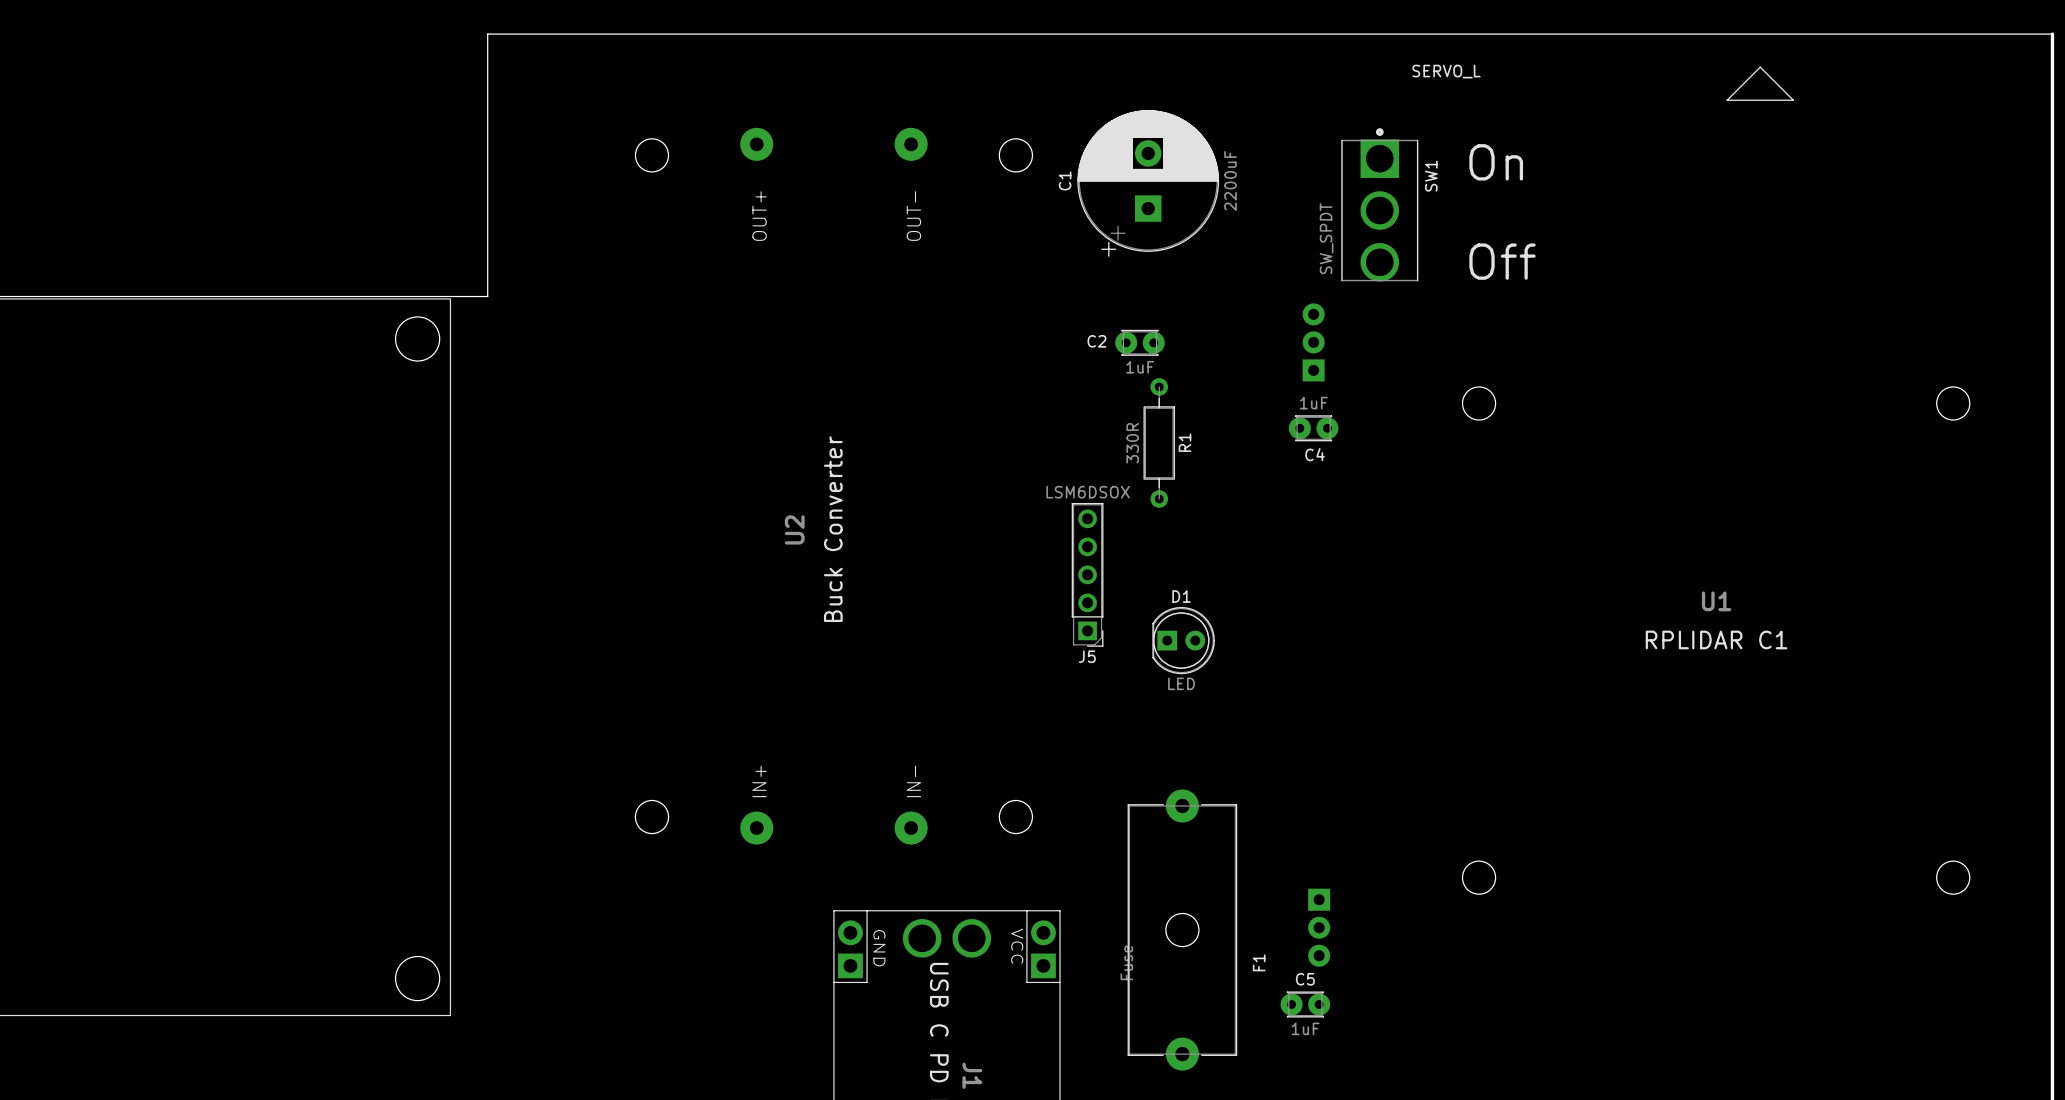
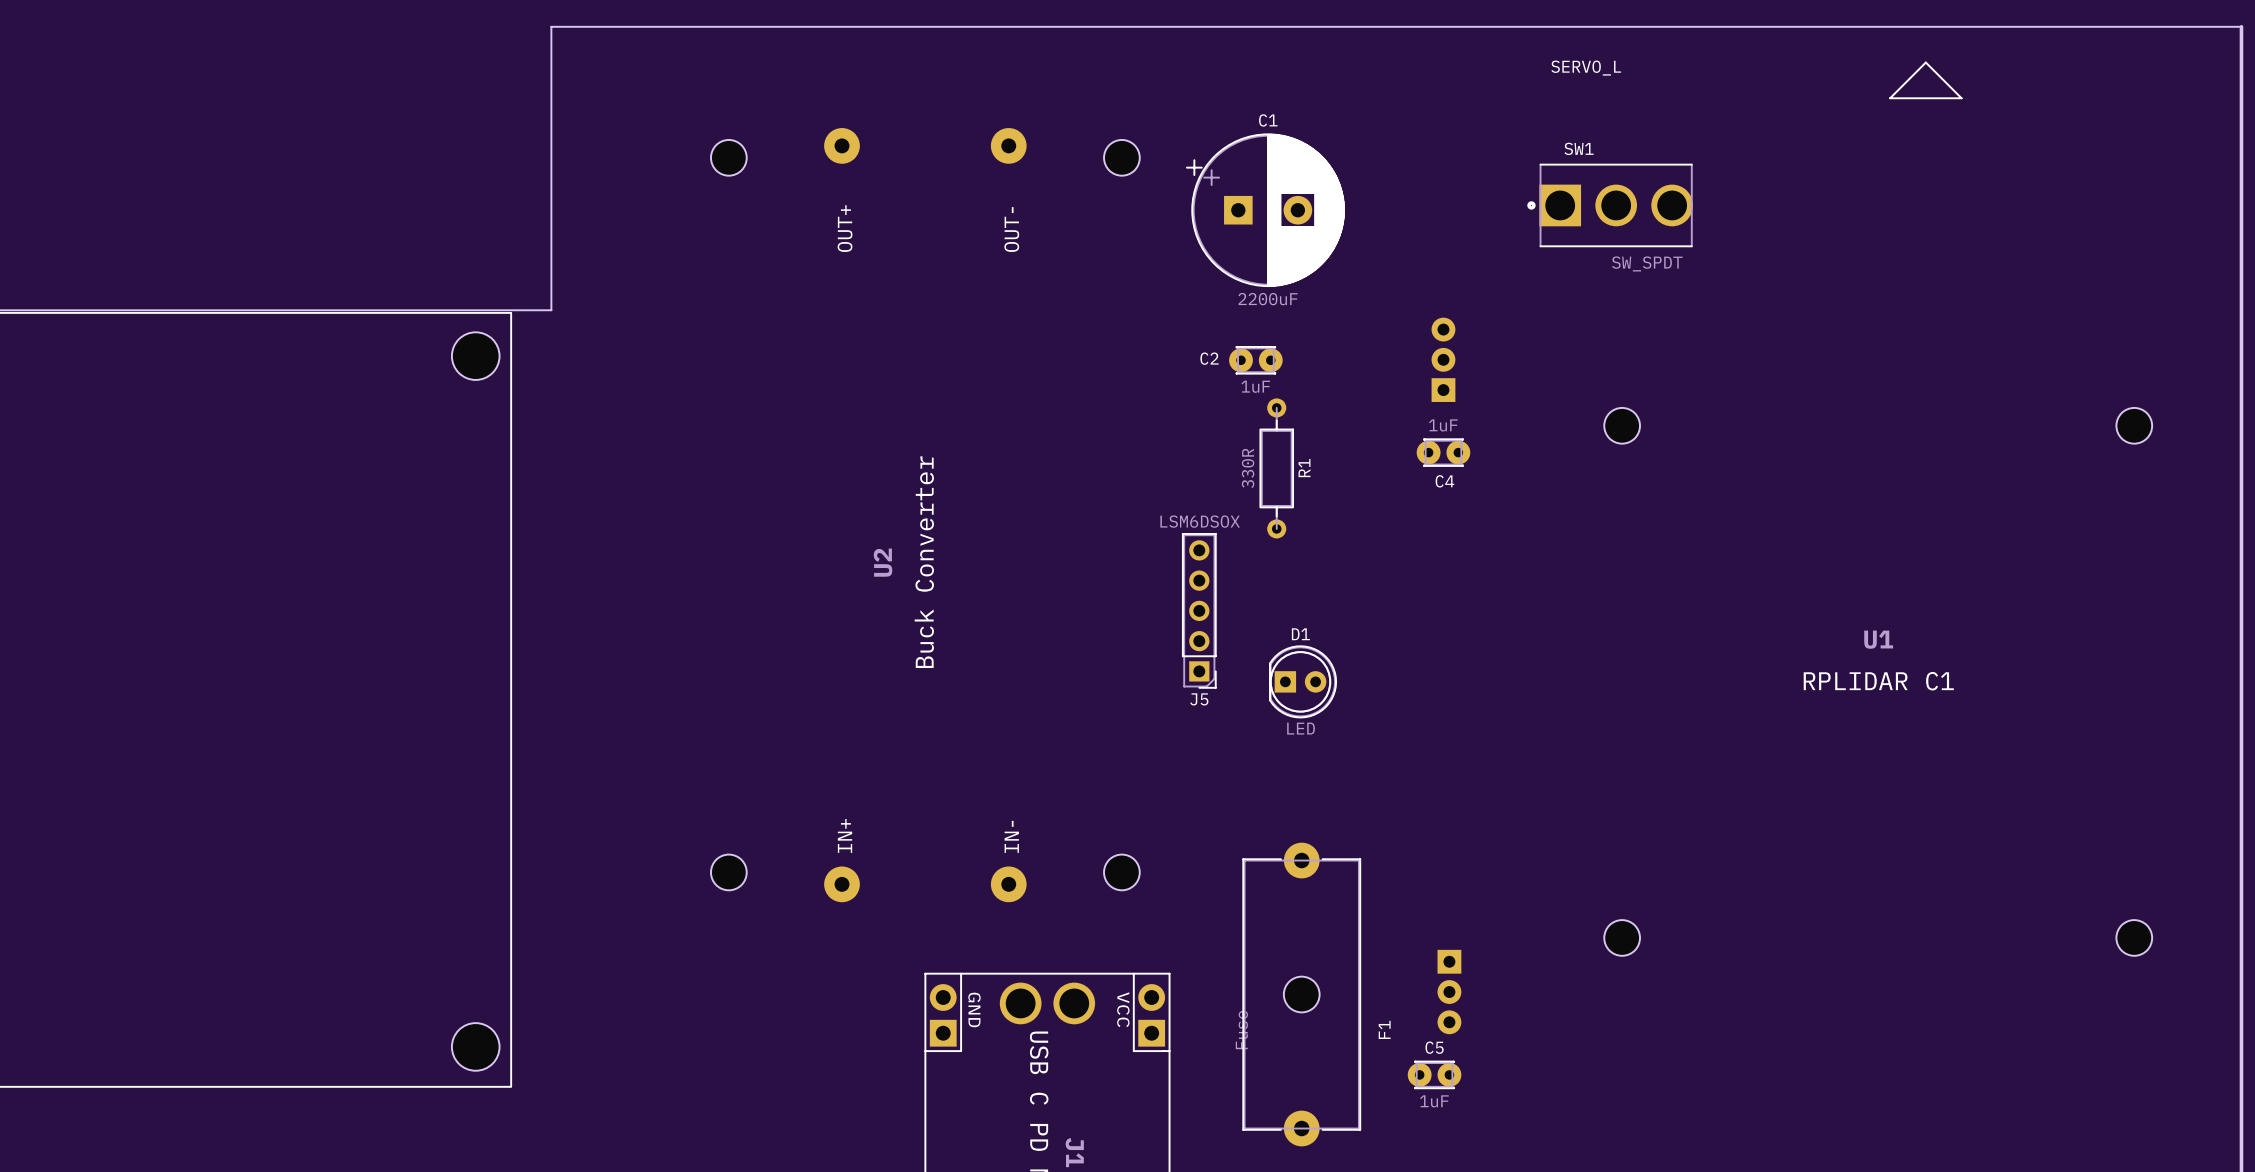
text: On (1496, 162) -> none
C1 rotation: 0° (1148, 183) -> 90° clockwise (1265, 210)
SW1 rotation: 0° (1379, 204) -> 90° counterclockwise (1610, 205)
text: Off (1502, 261) -> none

